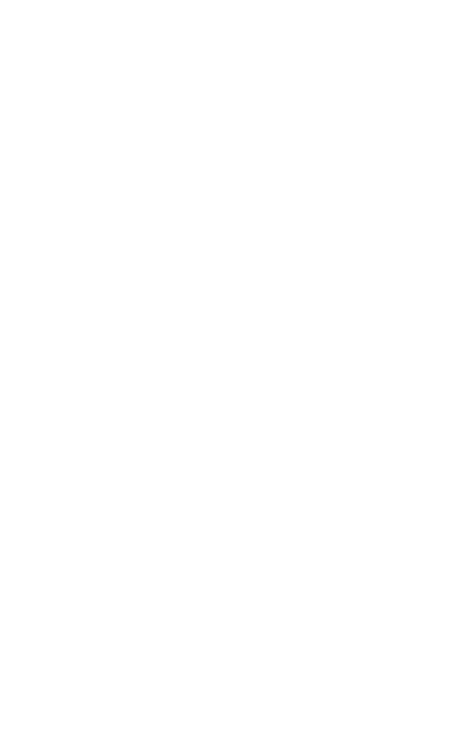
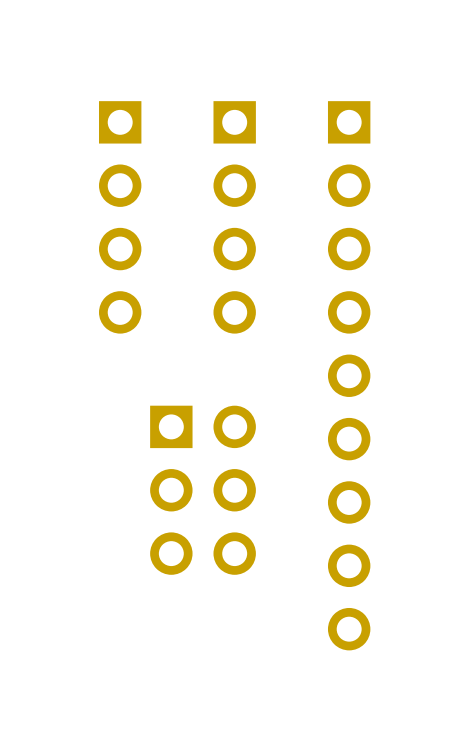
part: none -> (120, 217)
part: none -> (234, 217)
part: none -> (349, 375)
part: none -> (203, 490)

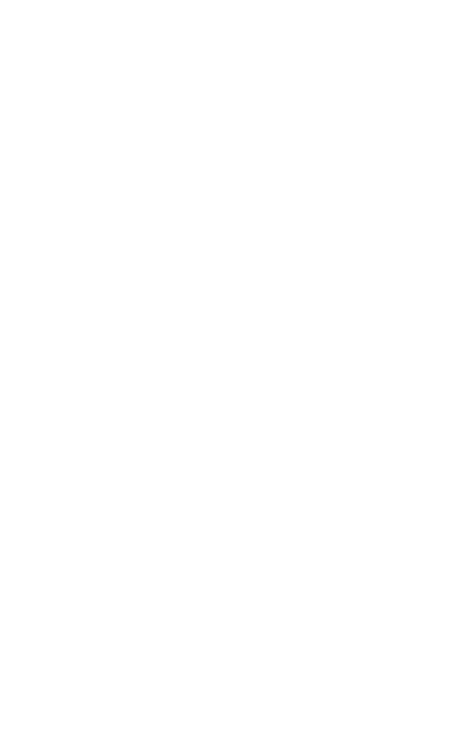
part: (120, 217) -> none
part: (234, 217) -> none
part: (349, 375) -> none
part: (203, 490) -> none

